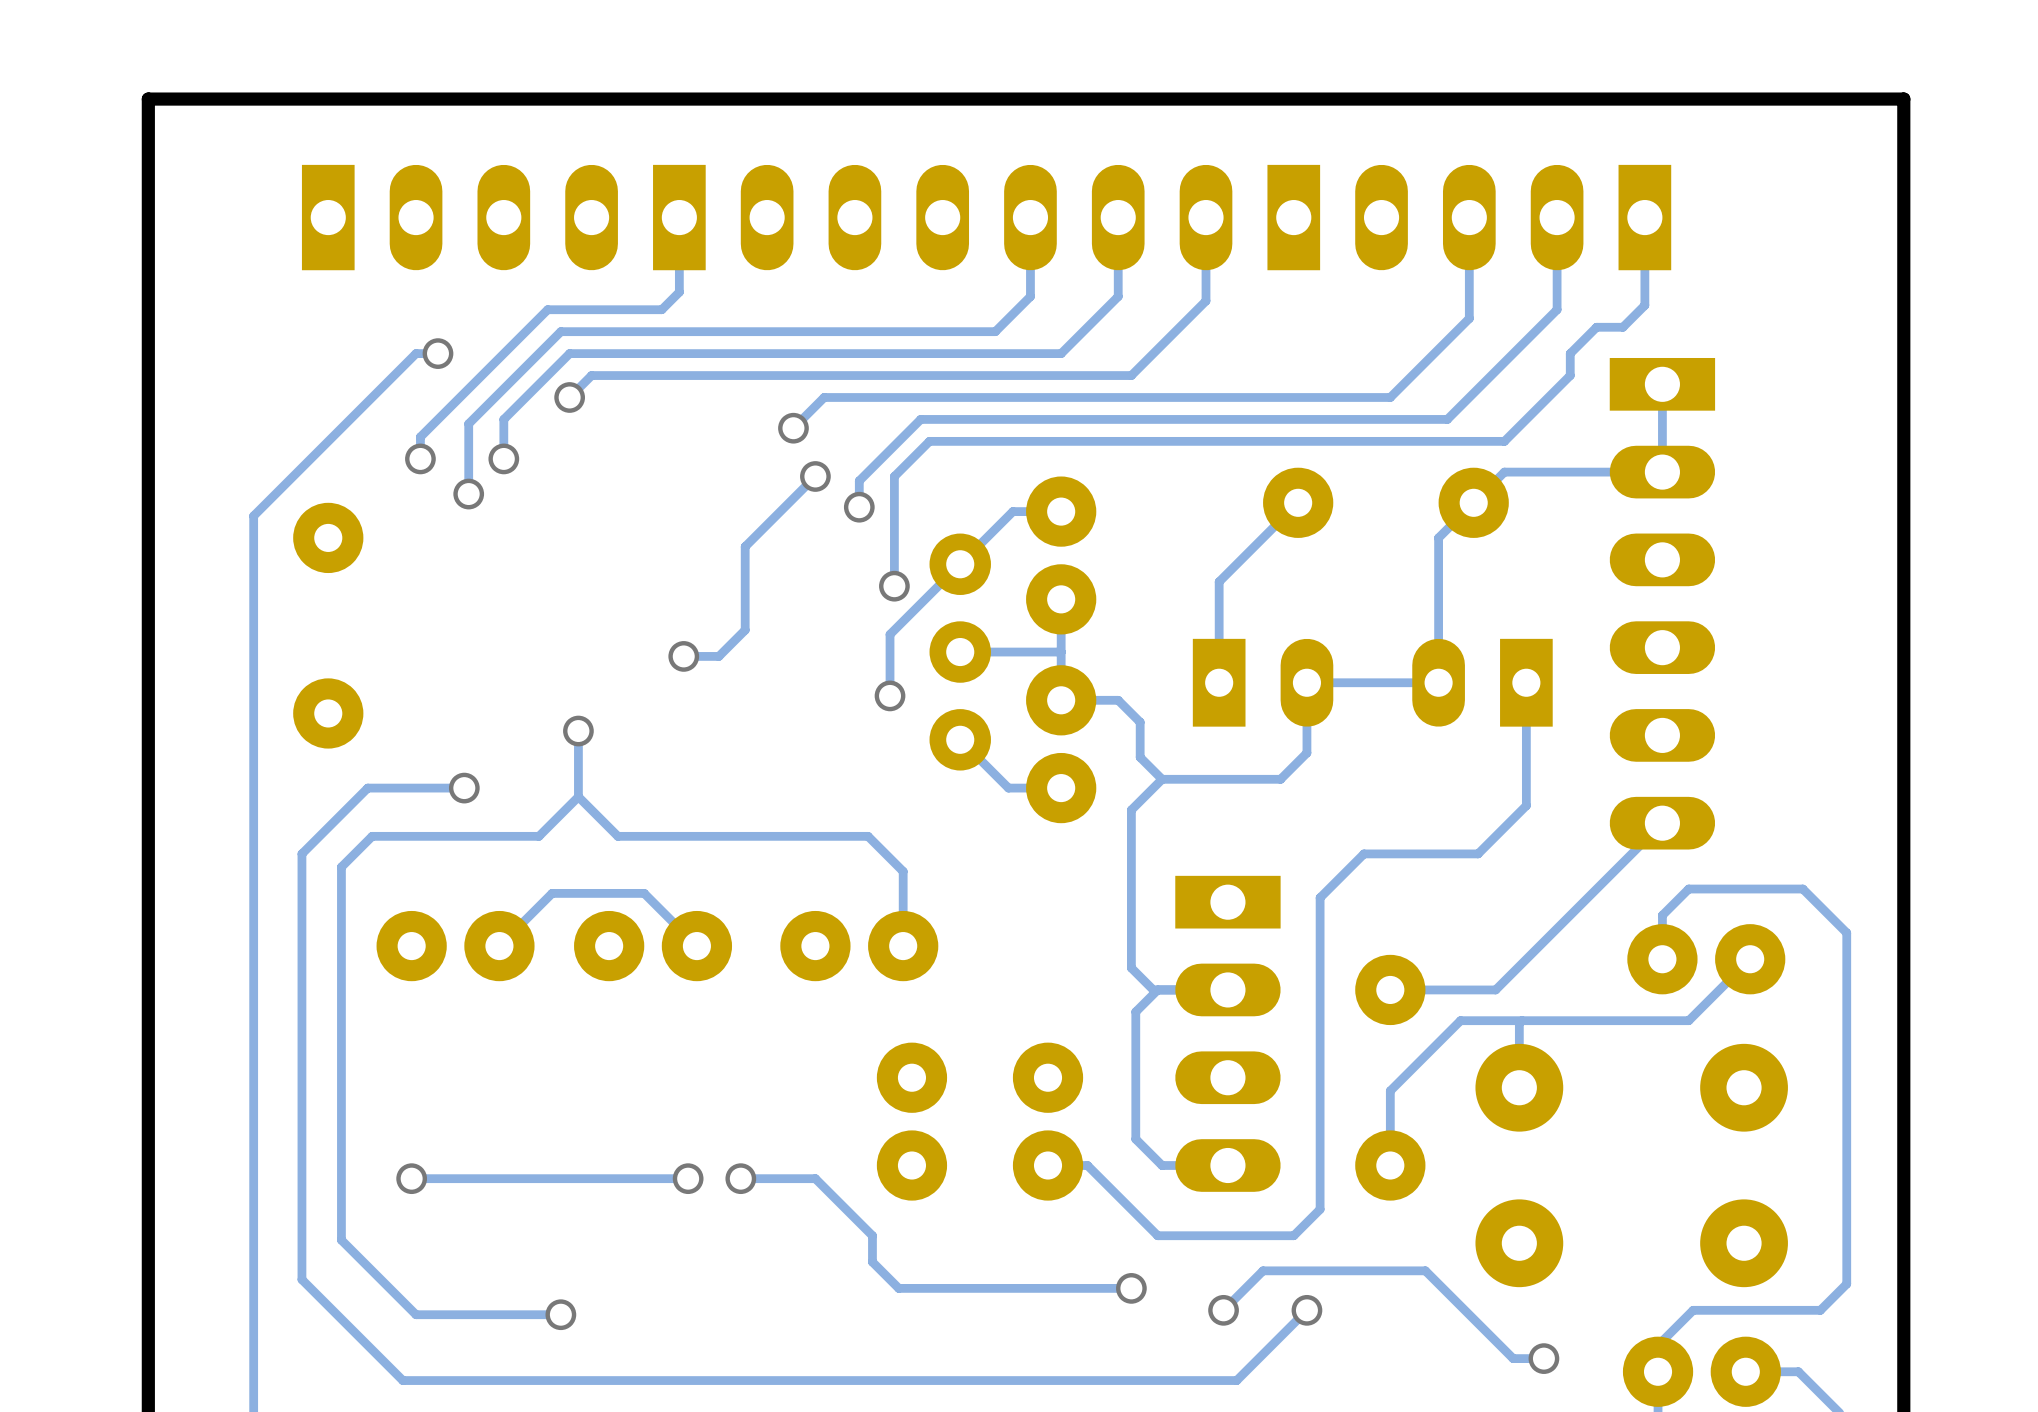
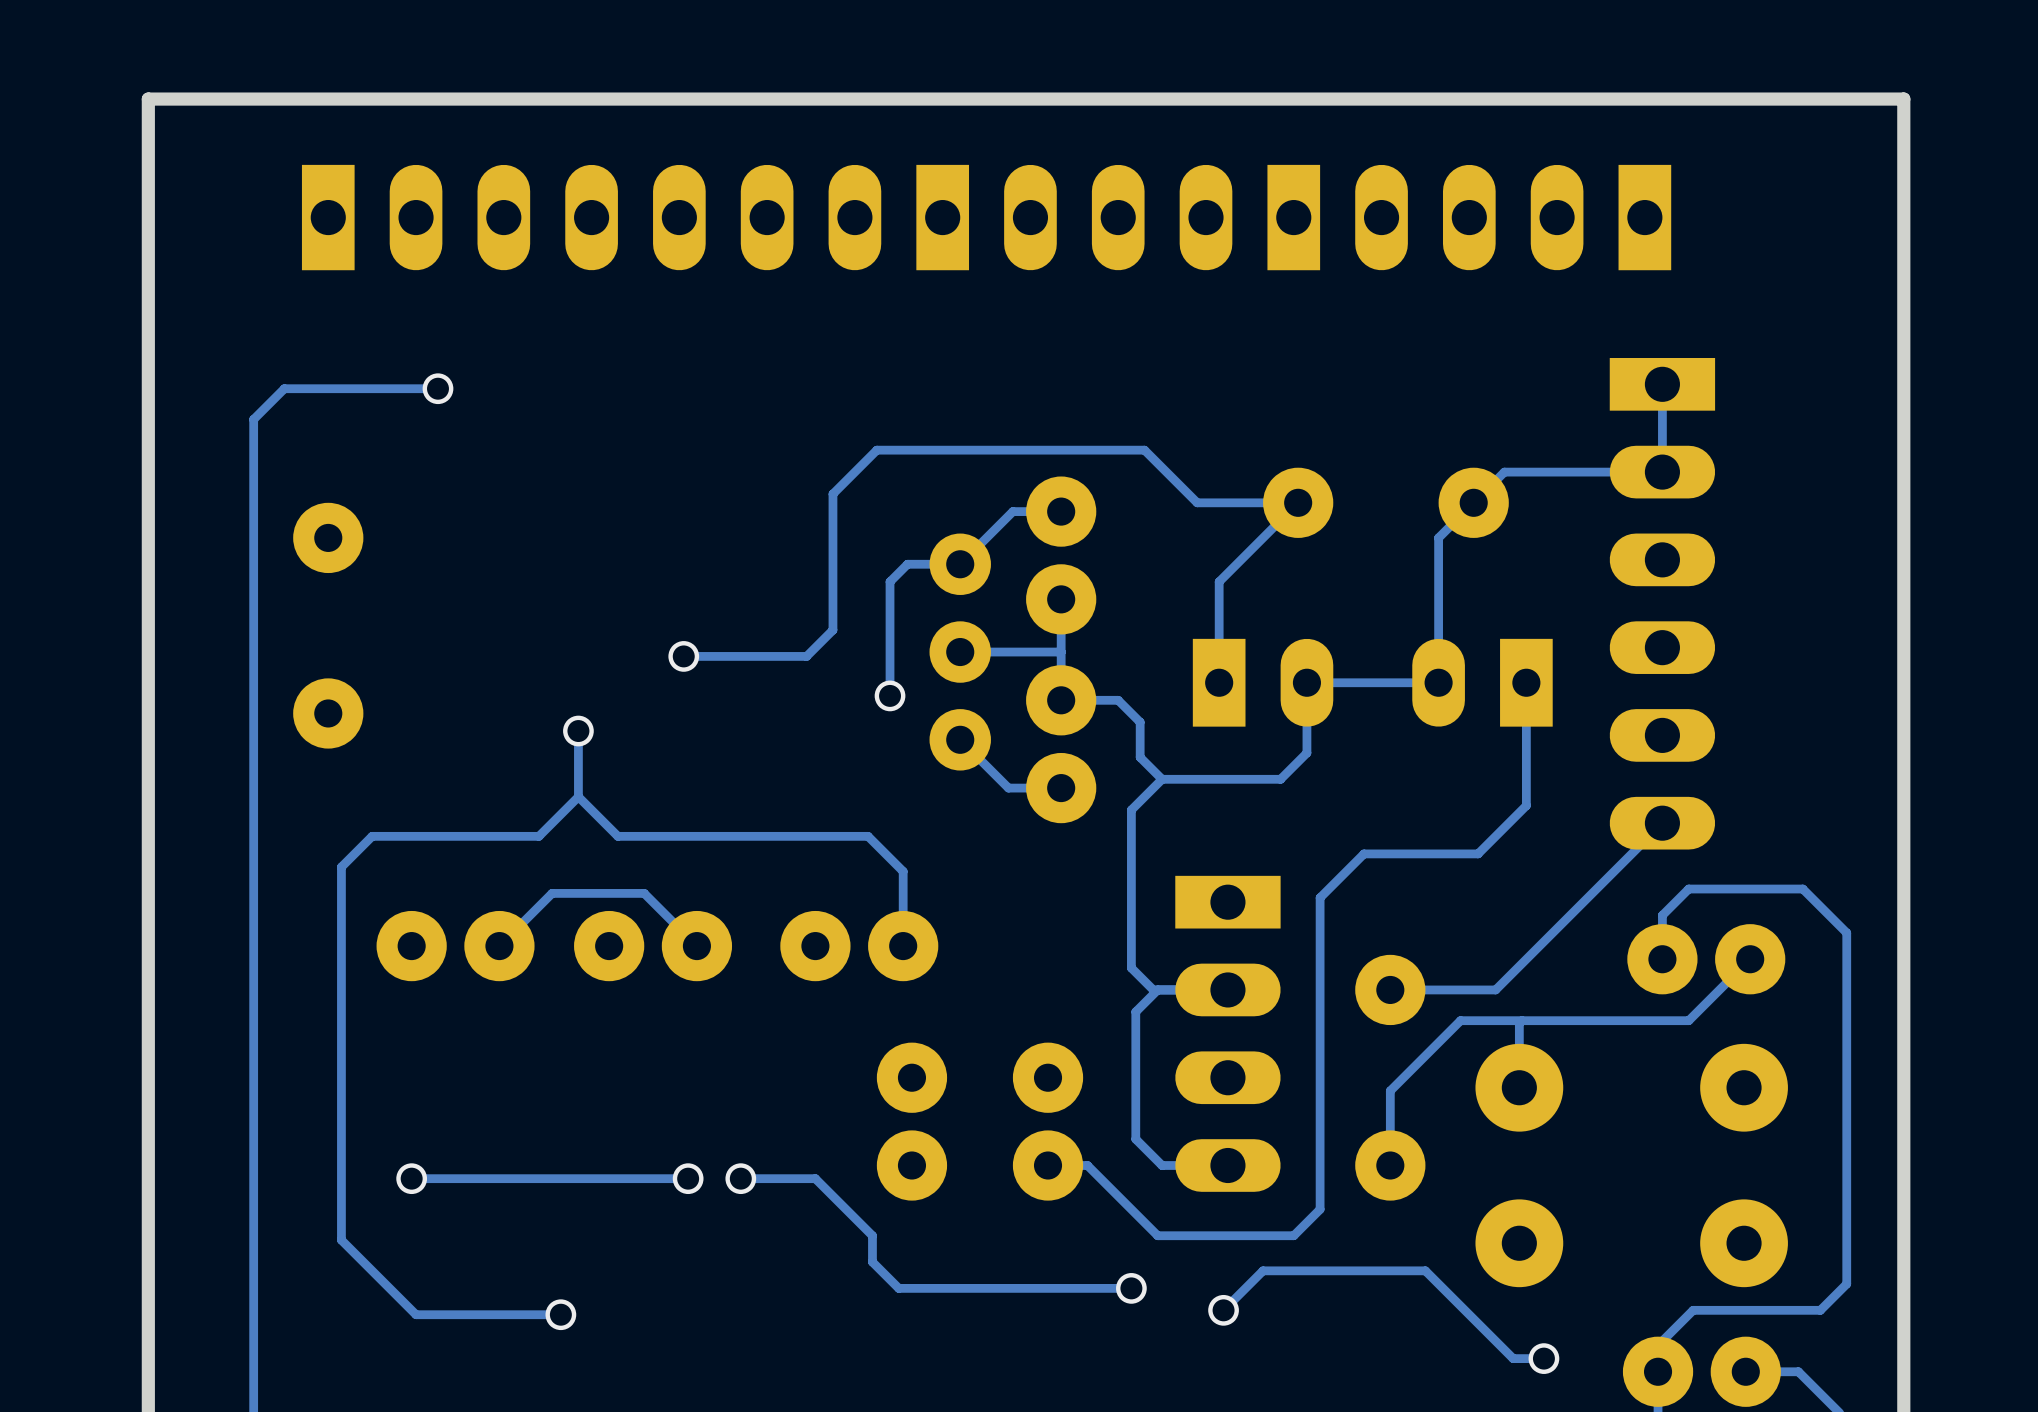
track: (679, 217) (679, 292) (661, 309) (547, 309) (420, 436) (420, 458) -> none
part rotation: 0° (811, 217) -> 180° (811, 217)
track: (1030, 217) (1030, 296) (995, 331) (560, 331) (468, 423) (468, 494) -> none
track: (1118, 217) (1118, 296) (1061, 353) (569, 353) (503, 419) (503, 458) -> none
track: (1206, 217) (1206, 300) (1131, 375) (591, 375) (569, 397) -> none
track: (1469, 217) (1469, 318) (1390, 397) (824, 397) (793, 428) -> none
track: (1557, 217) (1557, 309) (1447, 419) (920, 419) (859, 480) (859, 507) -> none
track: (1644, 217) (1644, 305) (1622, 327) (1596, 327) (1570, 353) (1570, 375) (1504, 441) (929, 441) (894, 476) (894, 586) -> none
track: (437, 353) (416, 353) (253, 515) -> (437, 388) (284, 388) (253, 419) (253, 515)
via position: (437, 353) -> (437, 388)
via: (569, 397) -> none
via: (793, 428) -> none
via: (420, 458) -> none
via: (503, 458) -> none
track: (815, 476) (745, 546) (745, 630) (718, 656) -> (1298, 502) (1197, 502) (1144, 450) (876, 450) (832, 494) (832, 630) (806, 656) (718, 656)
via: (815, 476) -> none
via: (468, 494) -> none
via: (859, 507) -> none
track: (960, 564) (890, 634) -> (960, 564) (907, 564) (890, 581) (890, 634)
via: (894, 586) -> none
track: (464, 788) (367, 788) (301, 853) (301, 1279) (402, 1380) (1236, 1380) (1306, 1310) -> none
via: (464, 788) -> none
via: (1306, 1310) -> none

